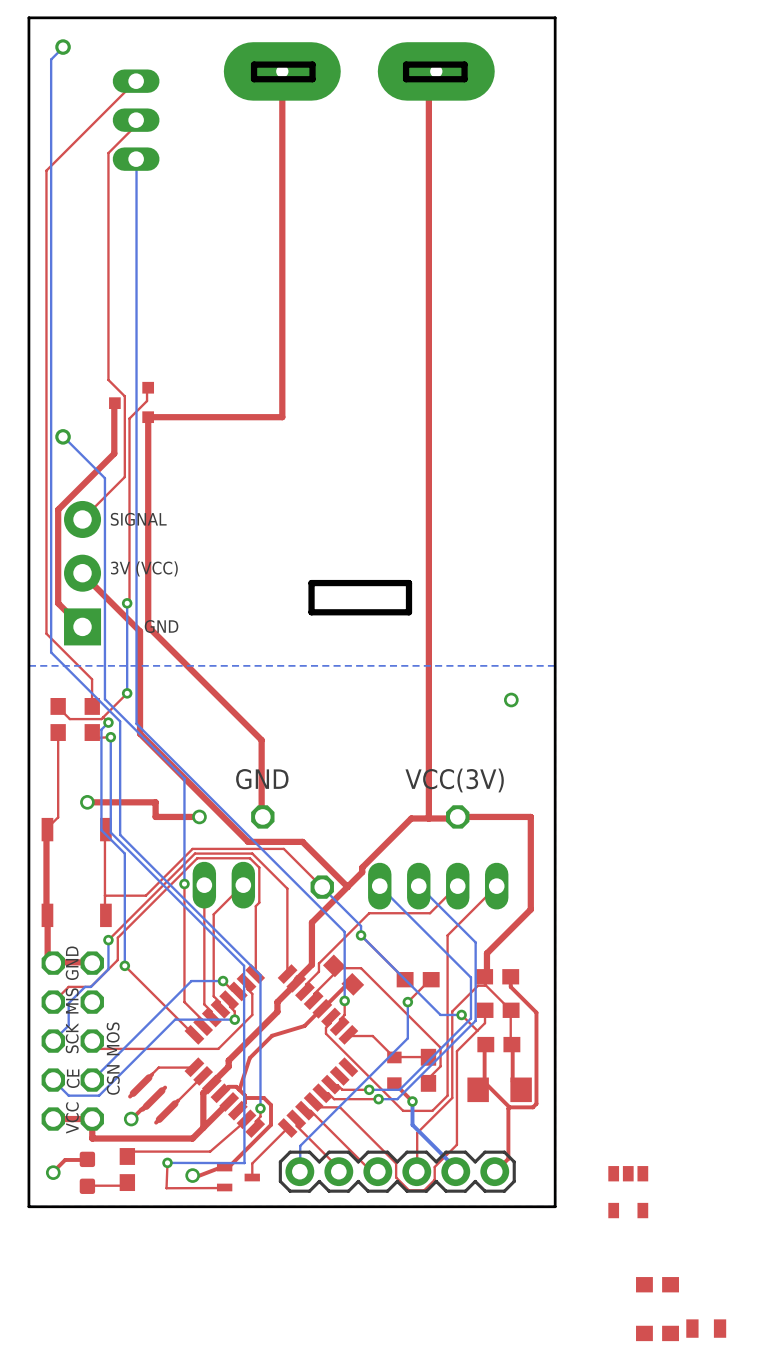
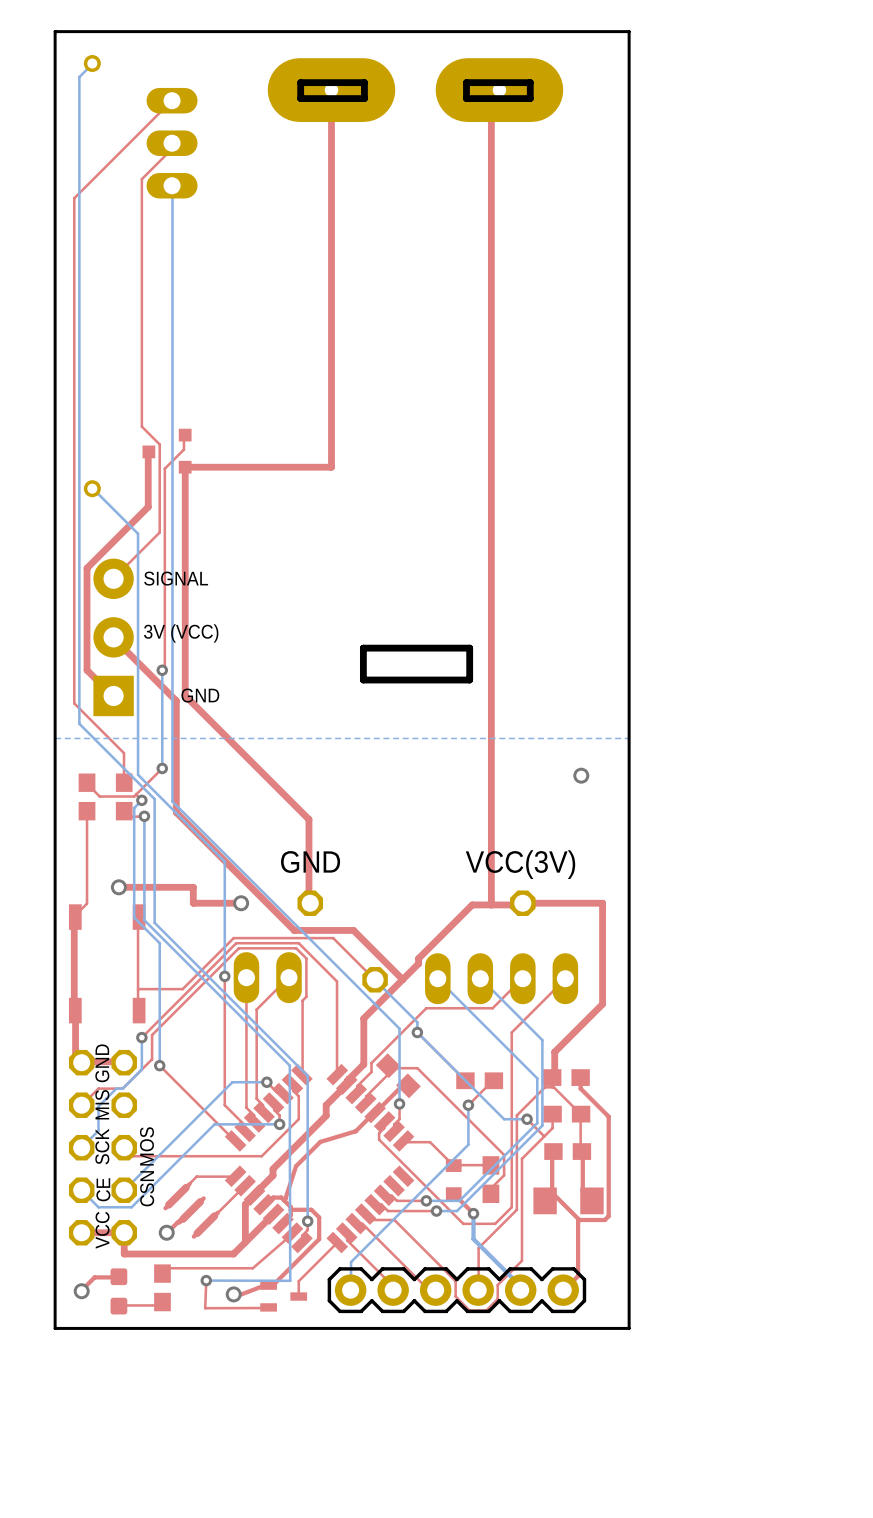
part: (628, 1192) -> none
part: (657, 1284) -> none
part: (706, 1328) -> none
part: (657, 1333) -> none

